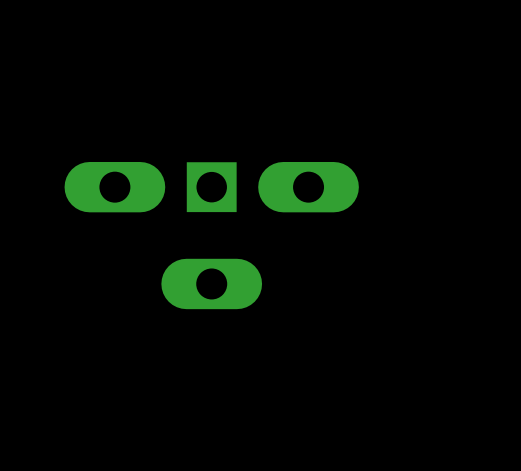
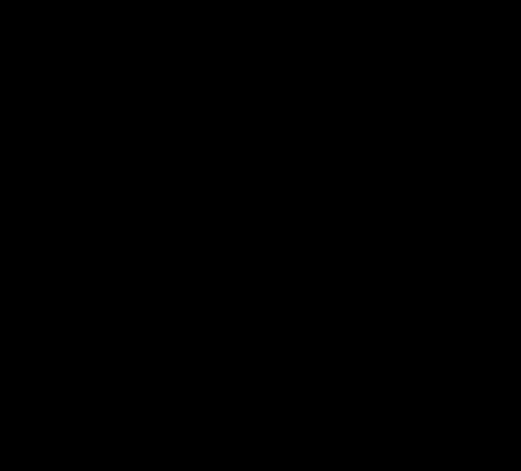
part: (211, 235) -> none

